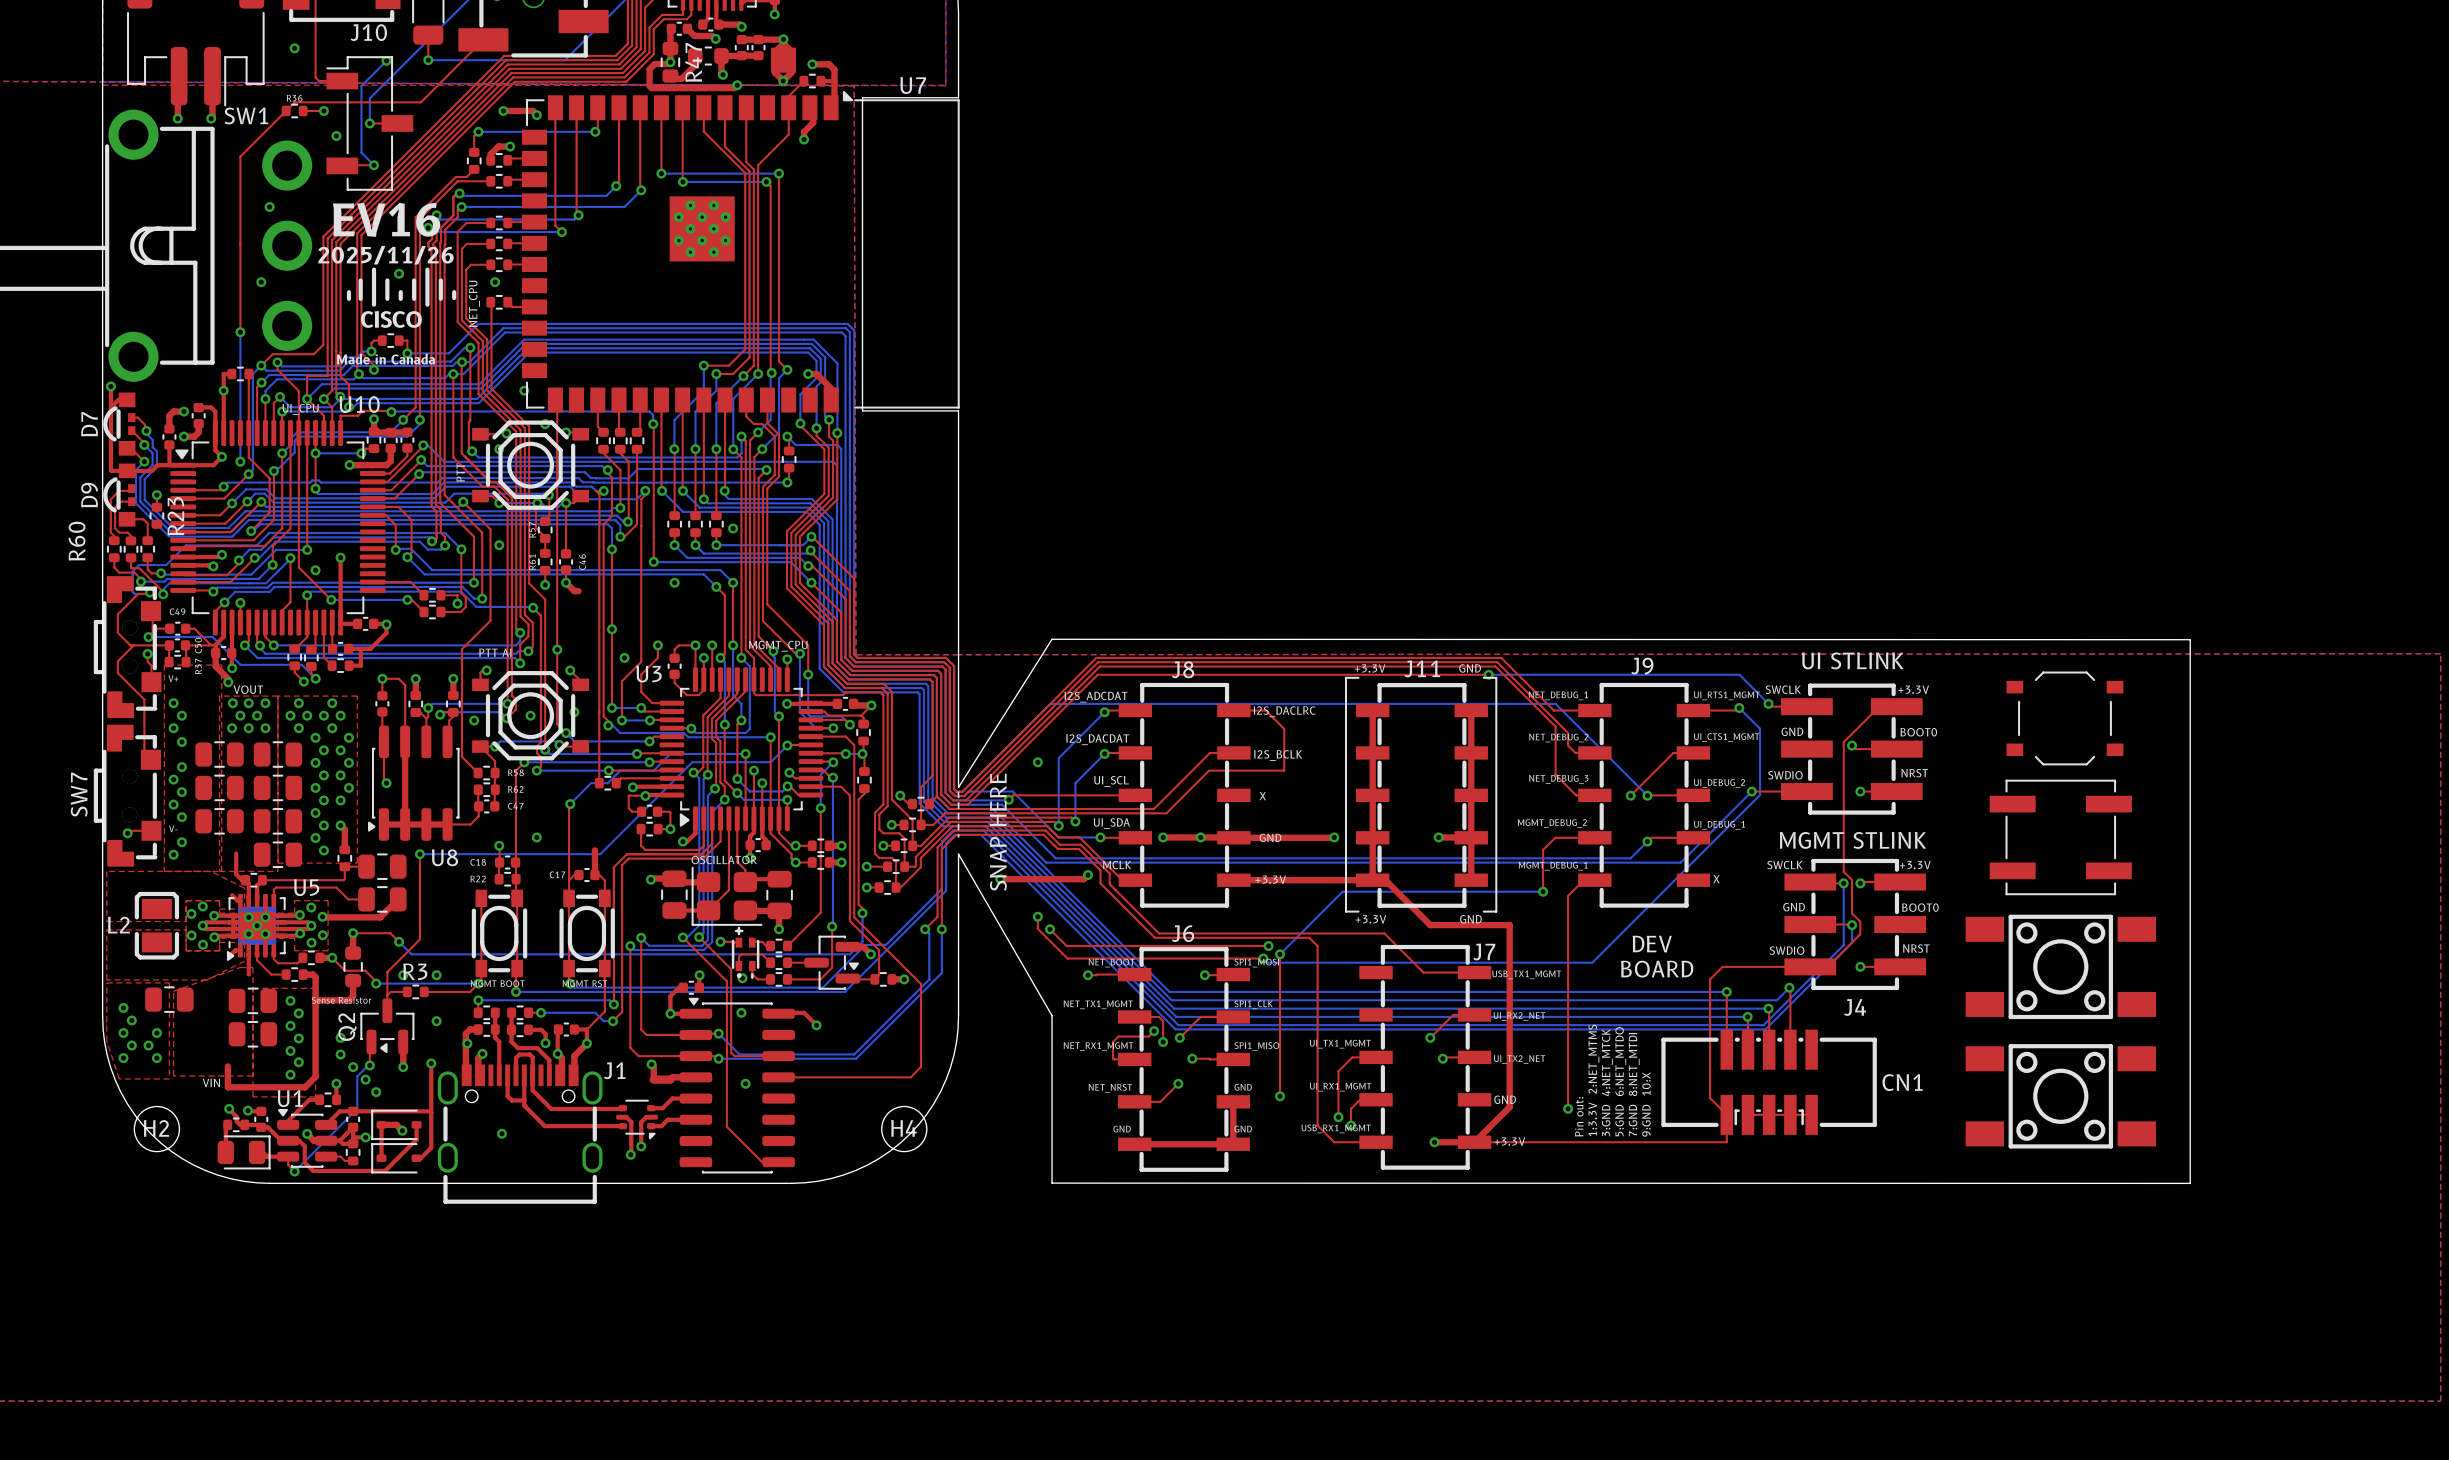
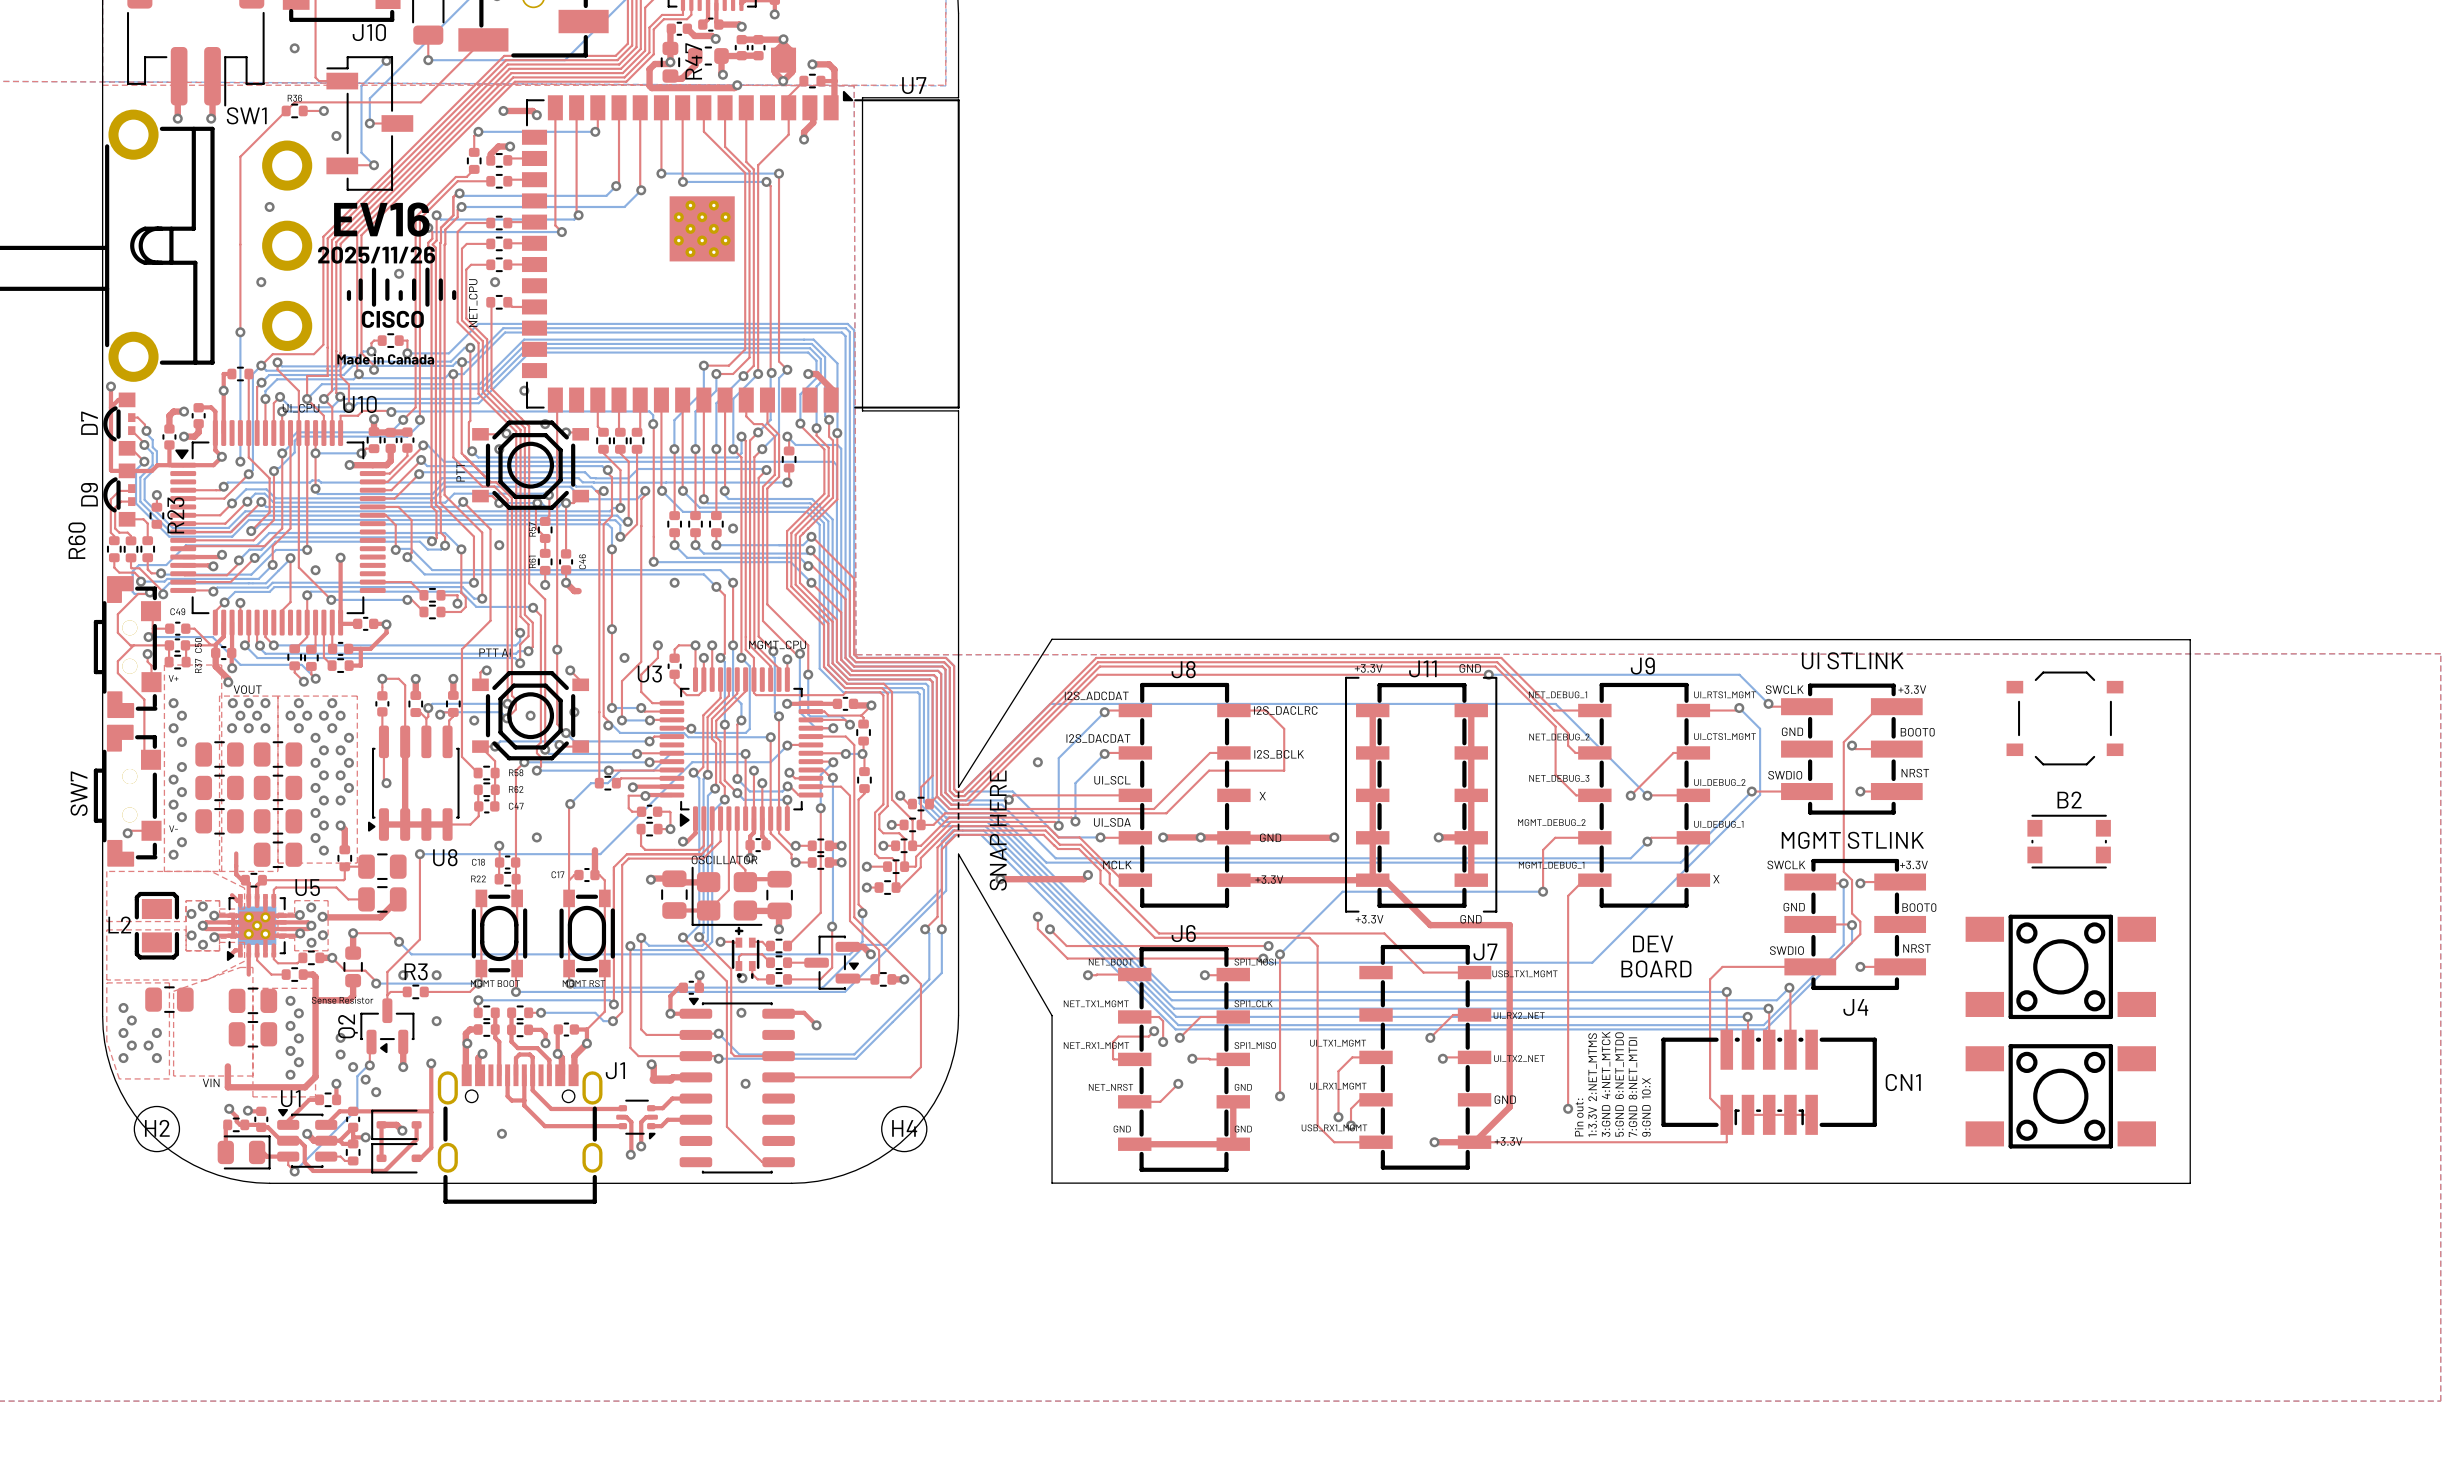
part: (2060, 837) -> none
B2: none -> (2069, 841)

